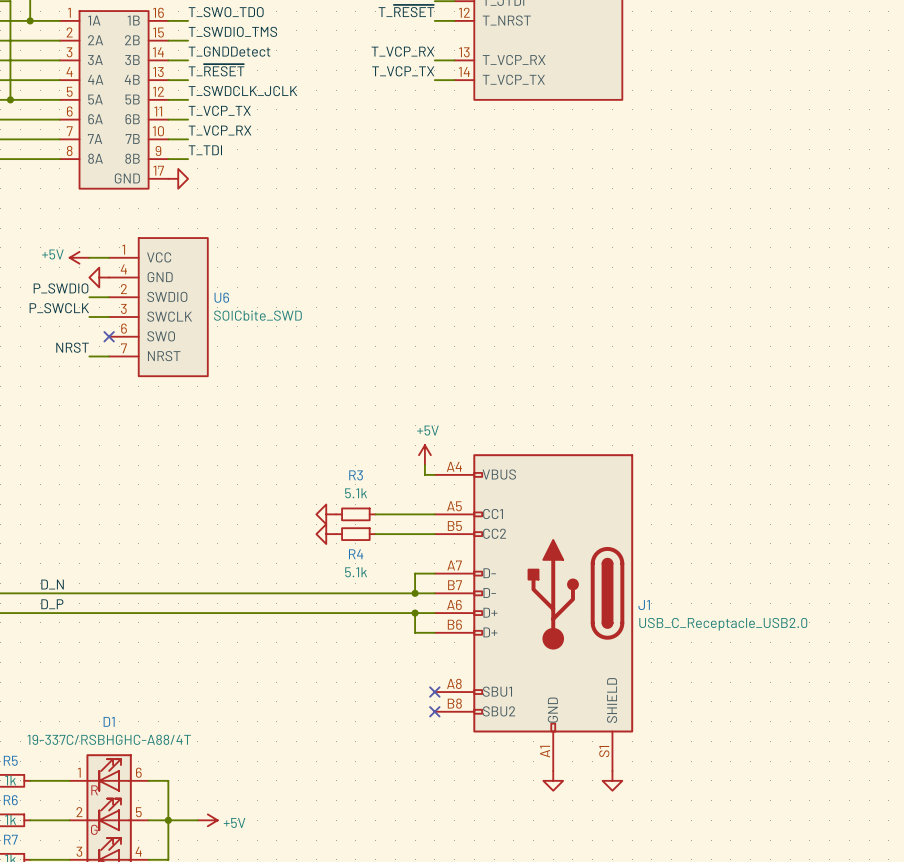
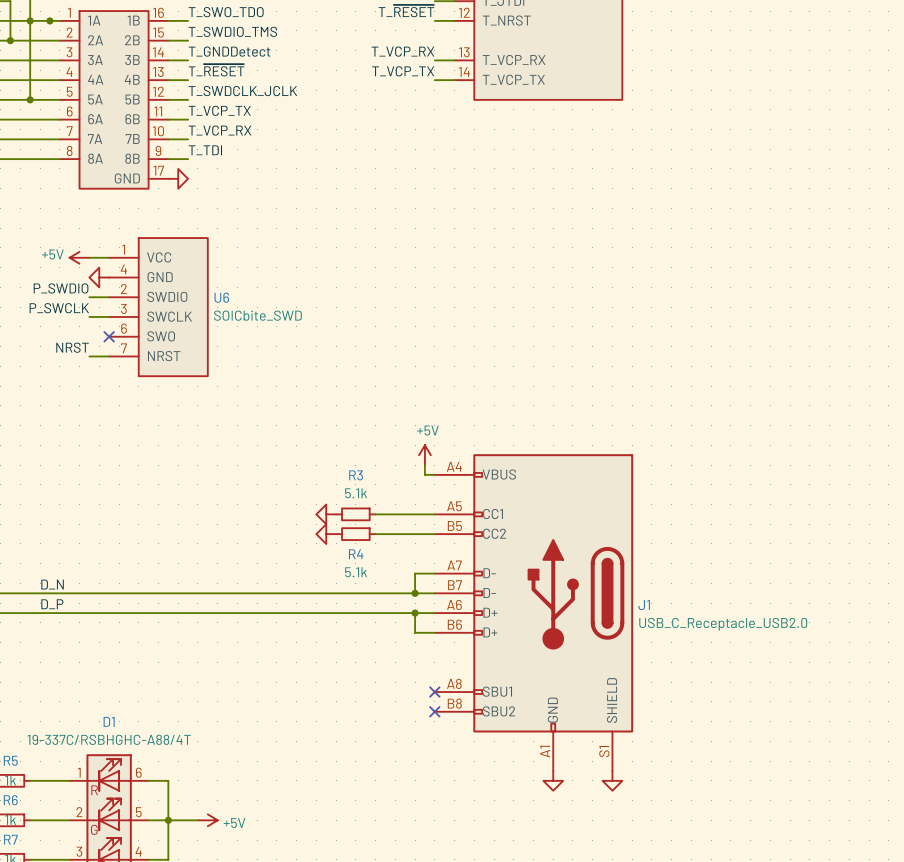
wire: none -> (30, 20) (30, 99)
junction: none -> (49, 20)
wire: (10, 40) (10, 99) -> none
junction: none -> (10, 40)
junction position: (10, 99) -> (30, 99)

